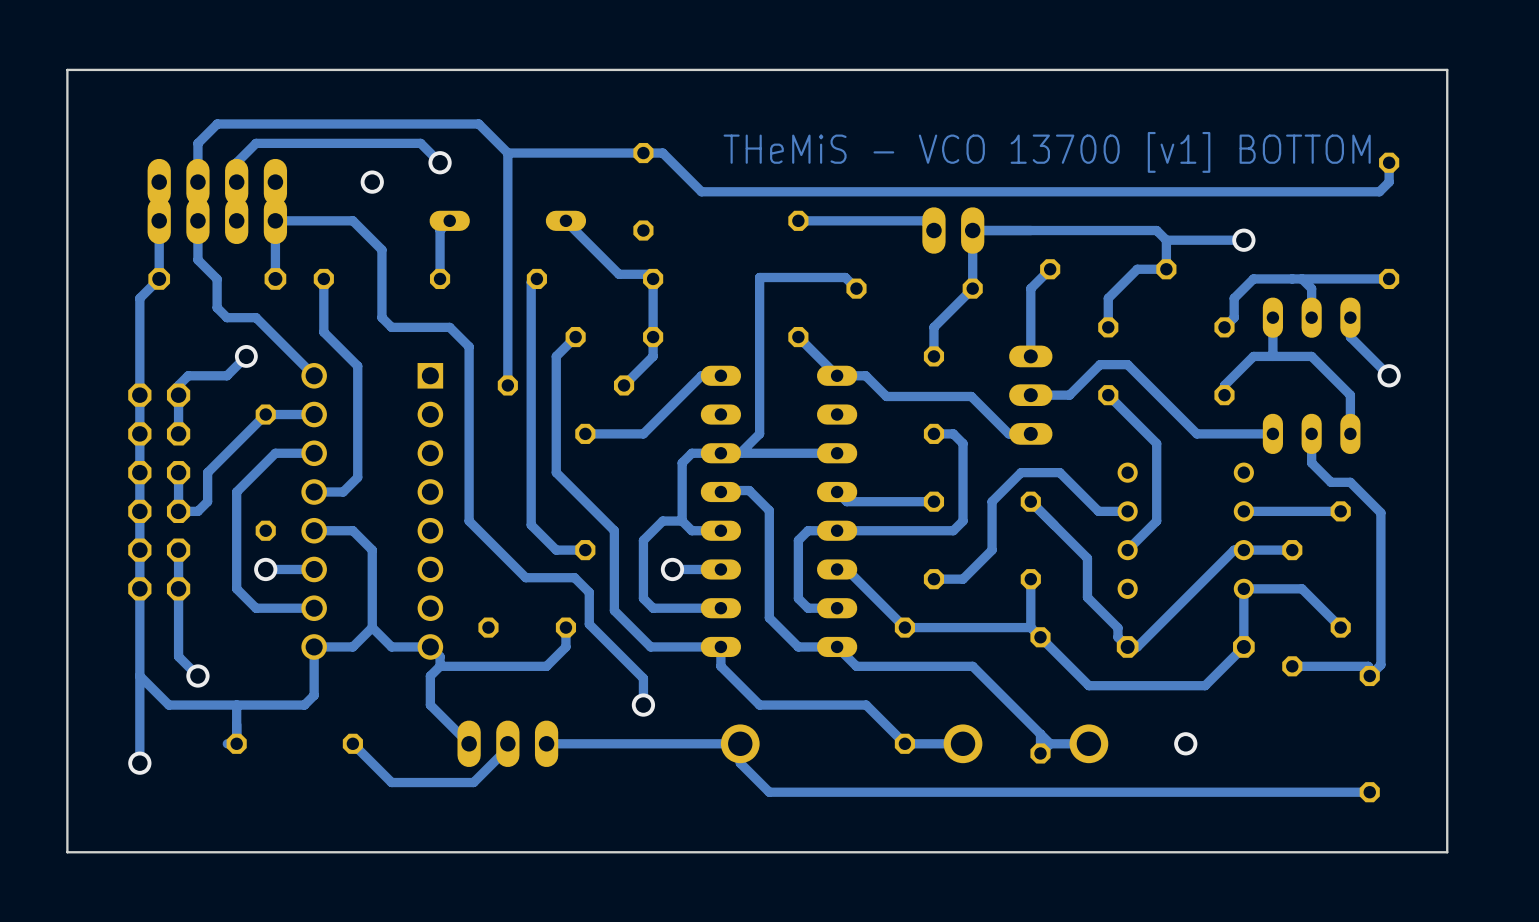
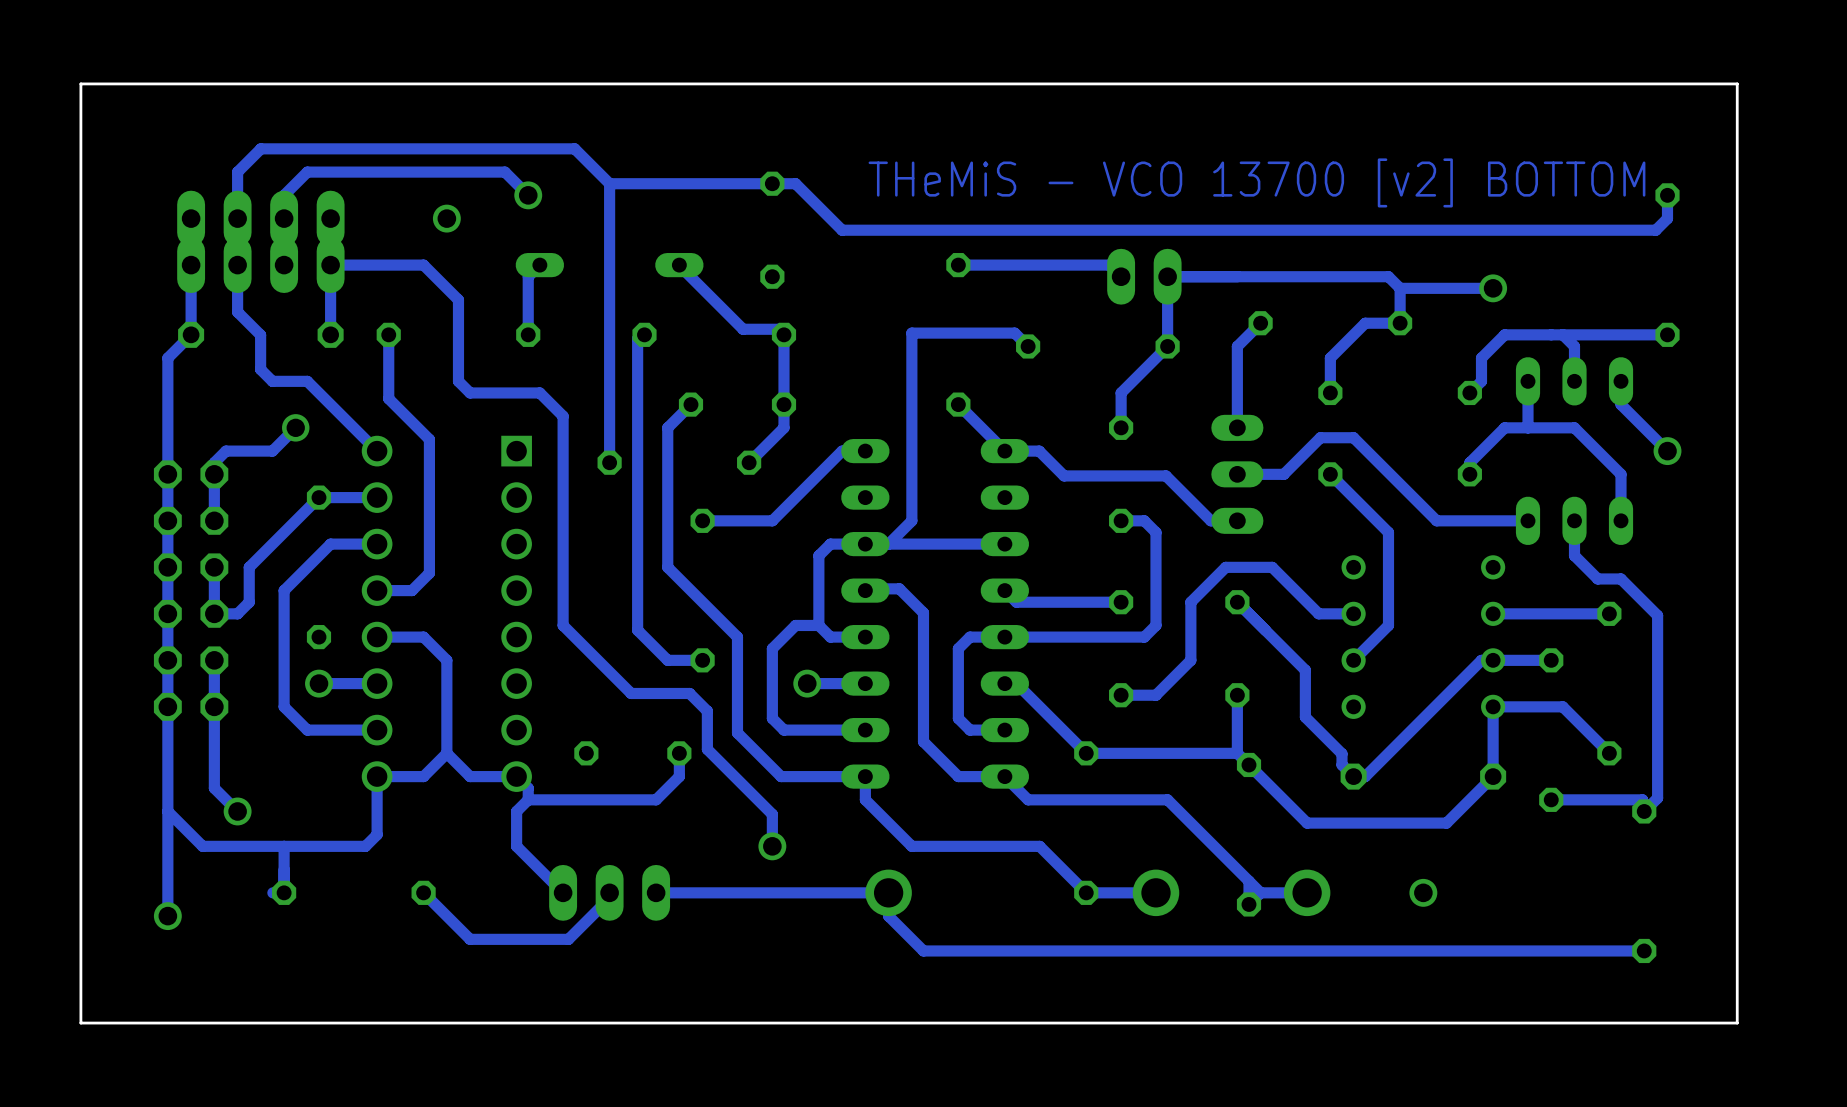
text: THeMiS - VCO 13700 [v1] BOTTOM (1047, 152) -> THeMiS - VCO 13700 [v2] BOTTOM (1256, 182)

